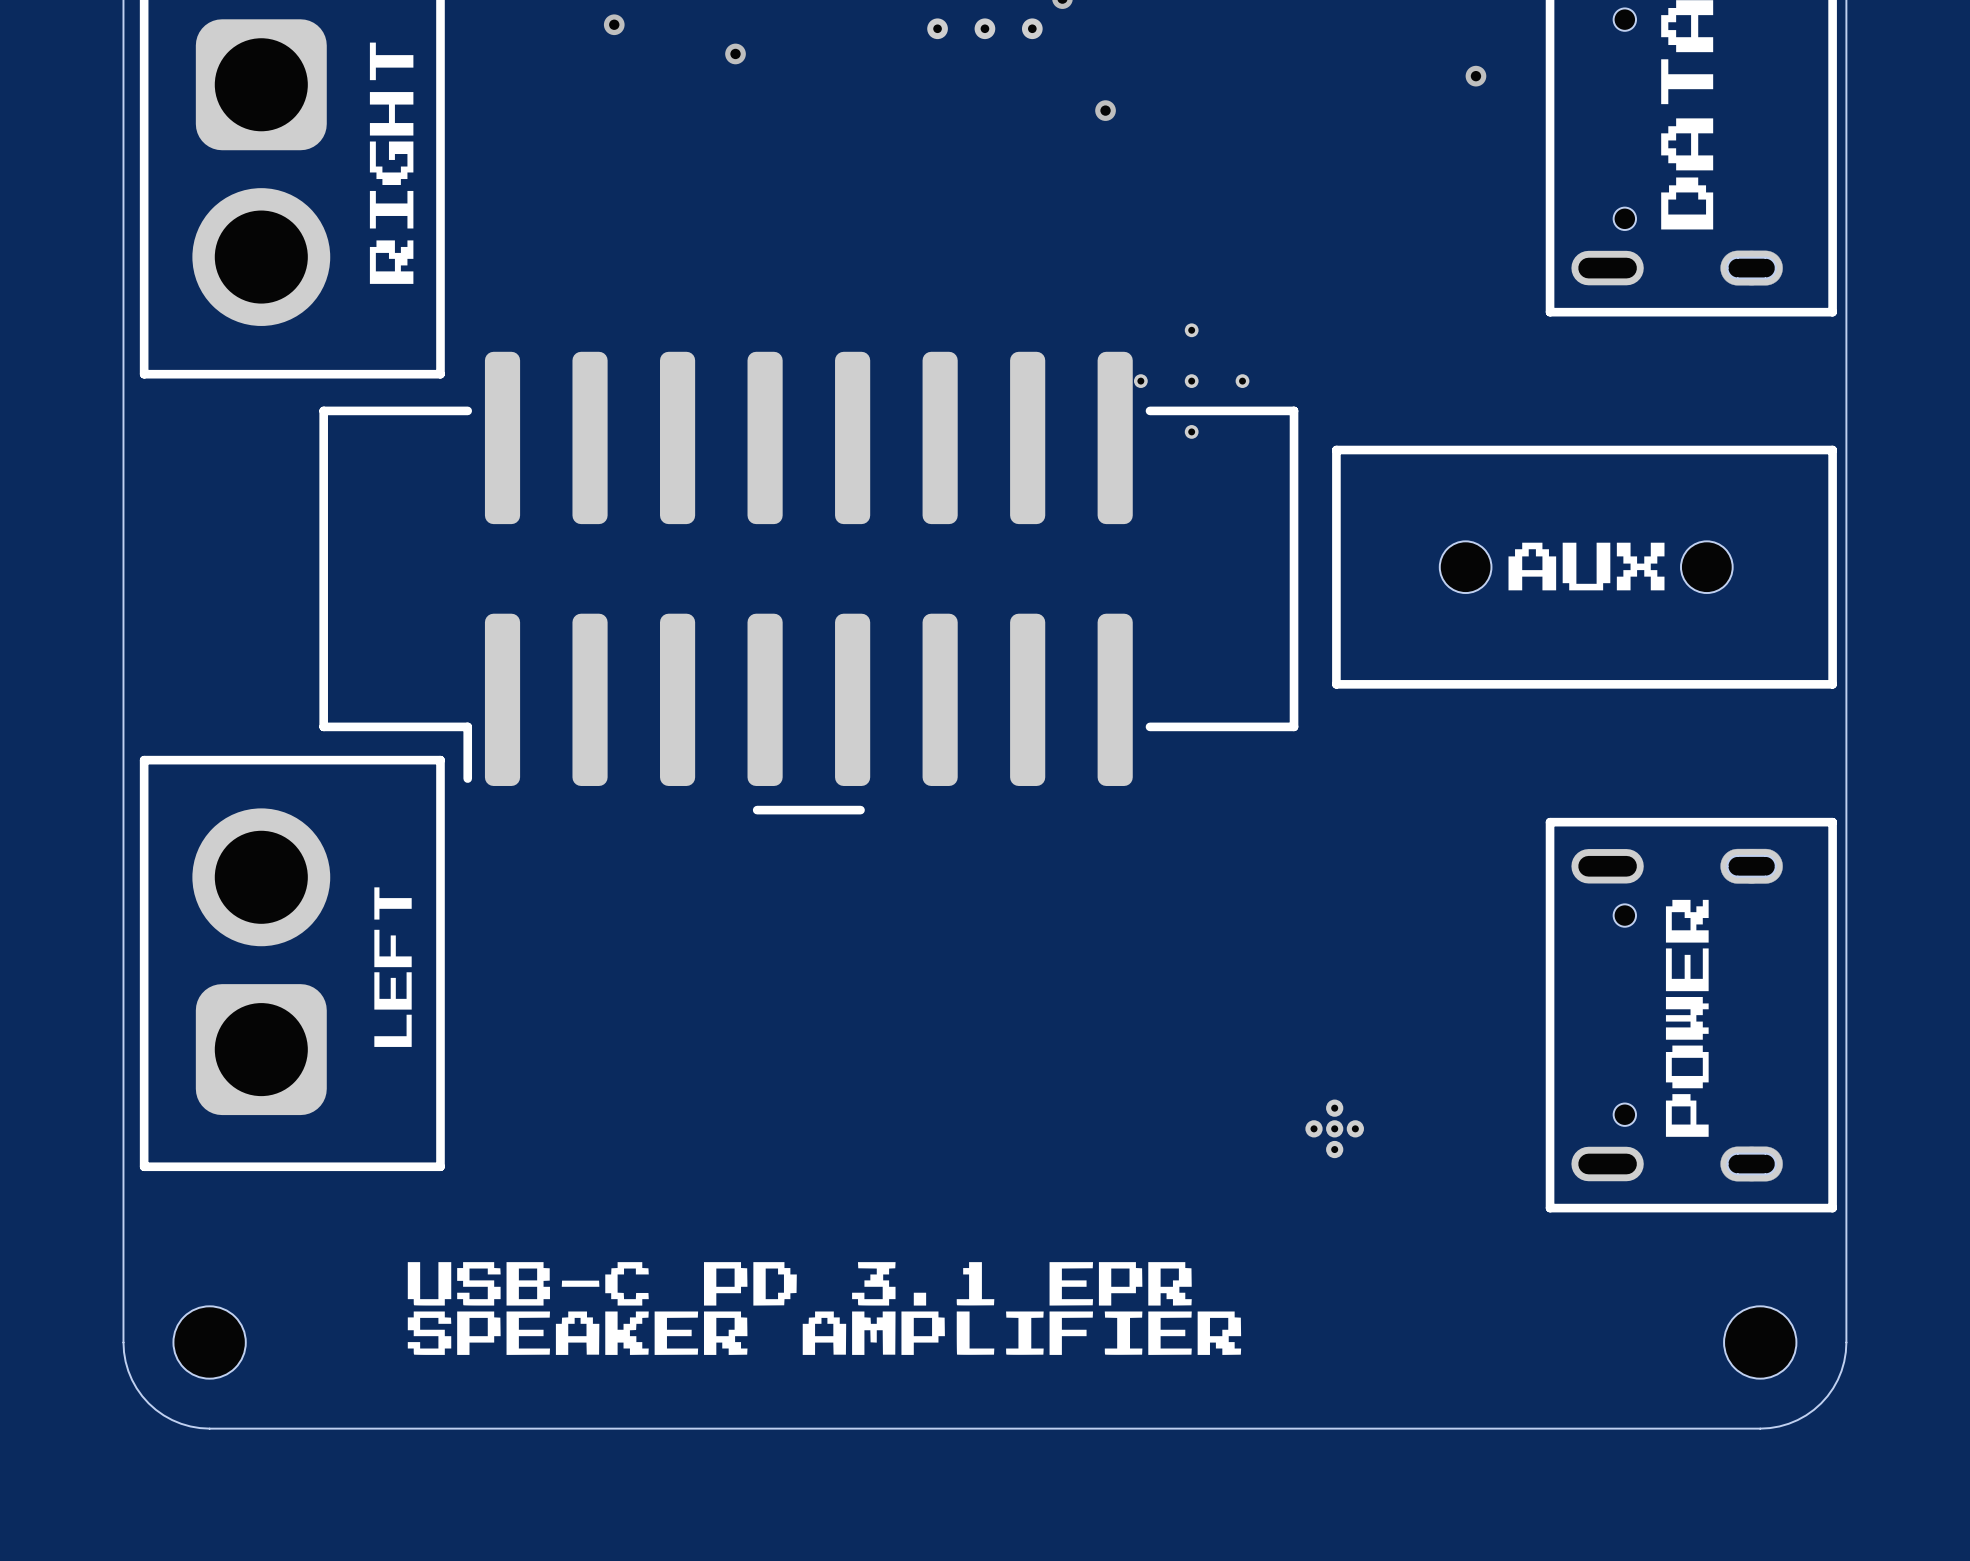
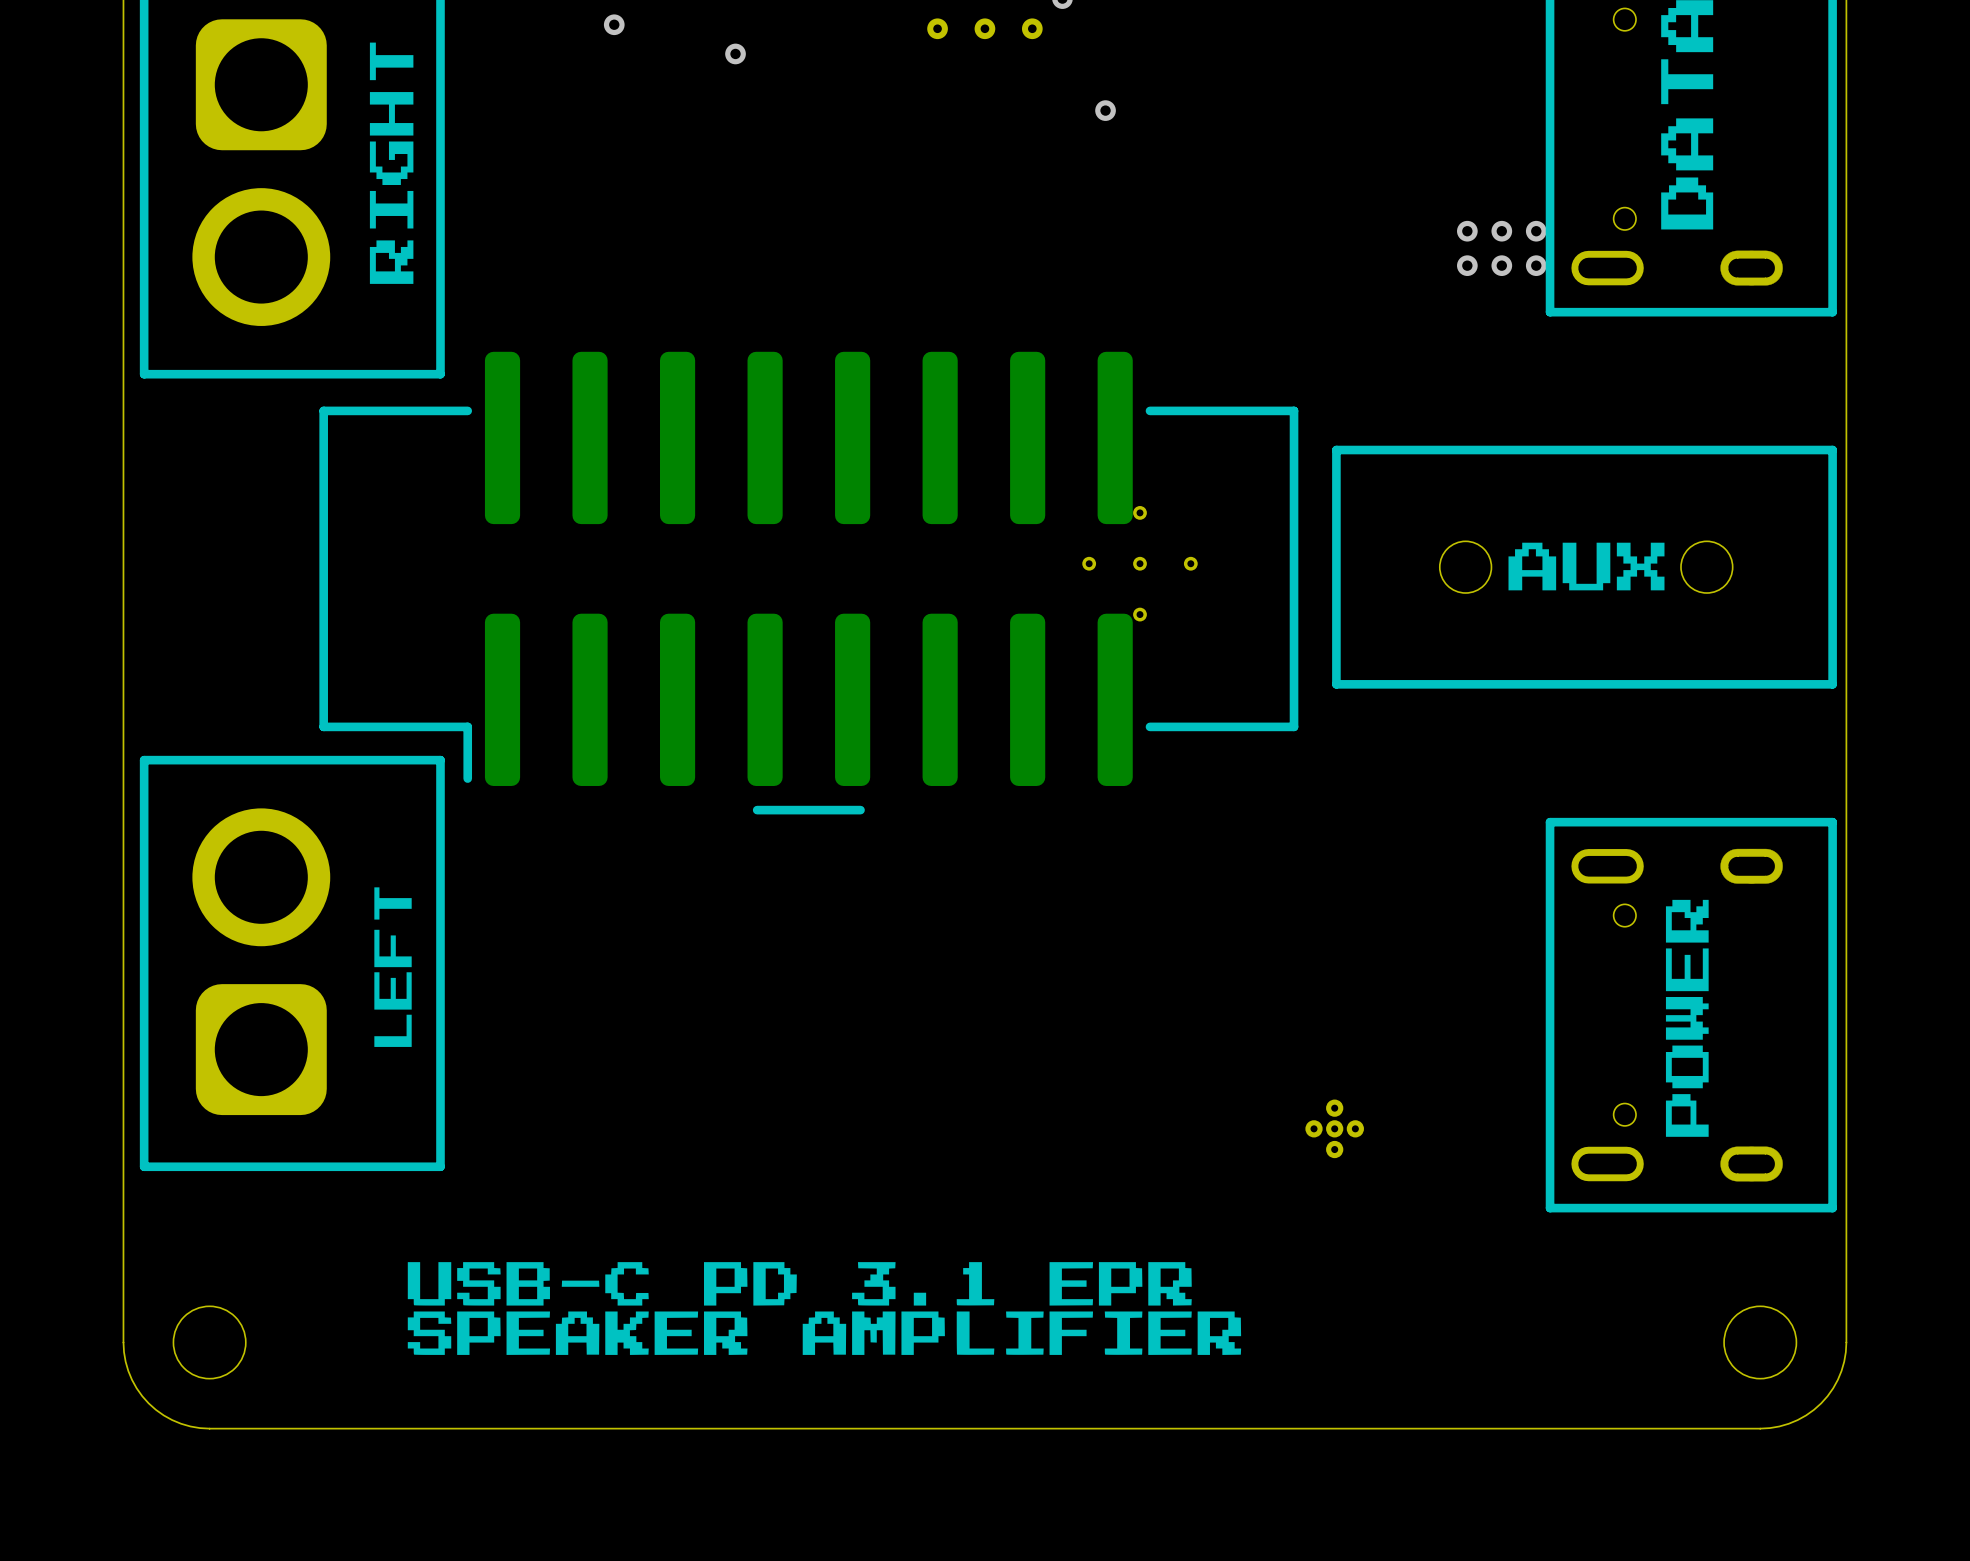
via: (1475, 76) -> none
via: none -> (1467, 231)
via: none -> (1501, 231)
via: none -> (1536, 231)
via: none -> (1467, 265)
via: none -> (1501, 265)
via: none -> (1536, 265)
part position: (1191, 381) -> (1139, 563)

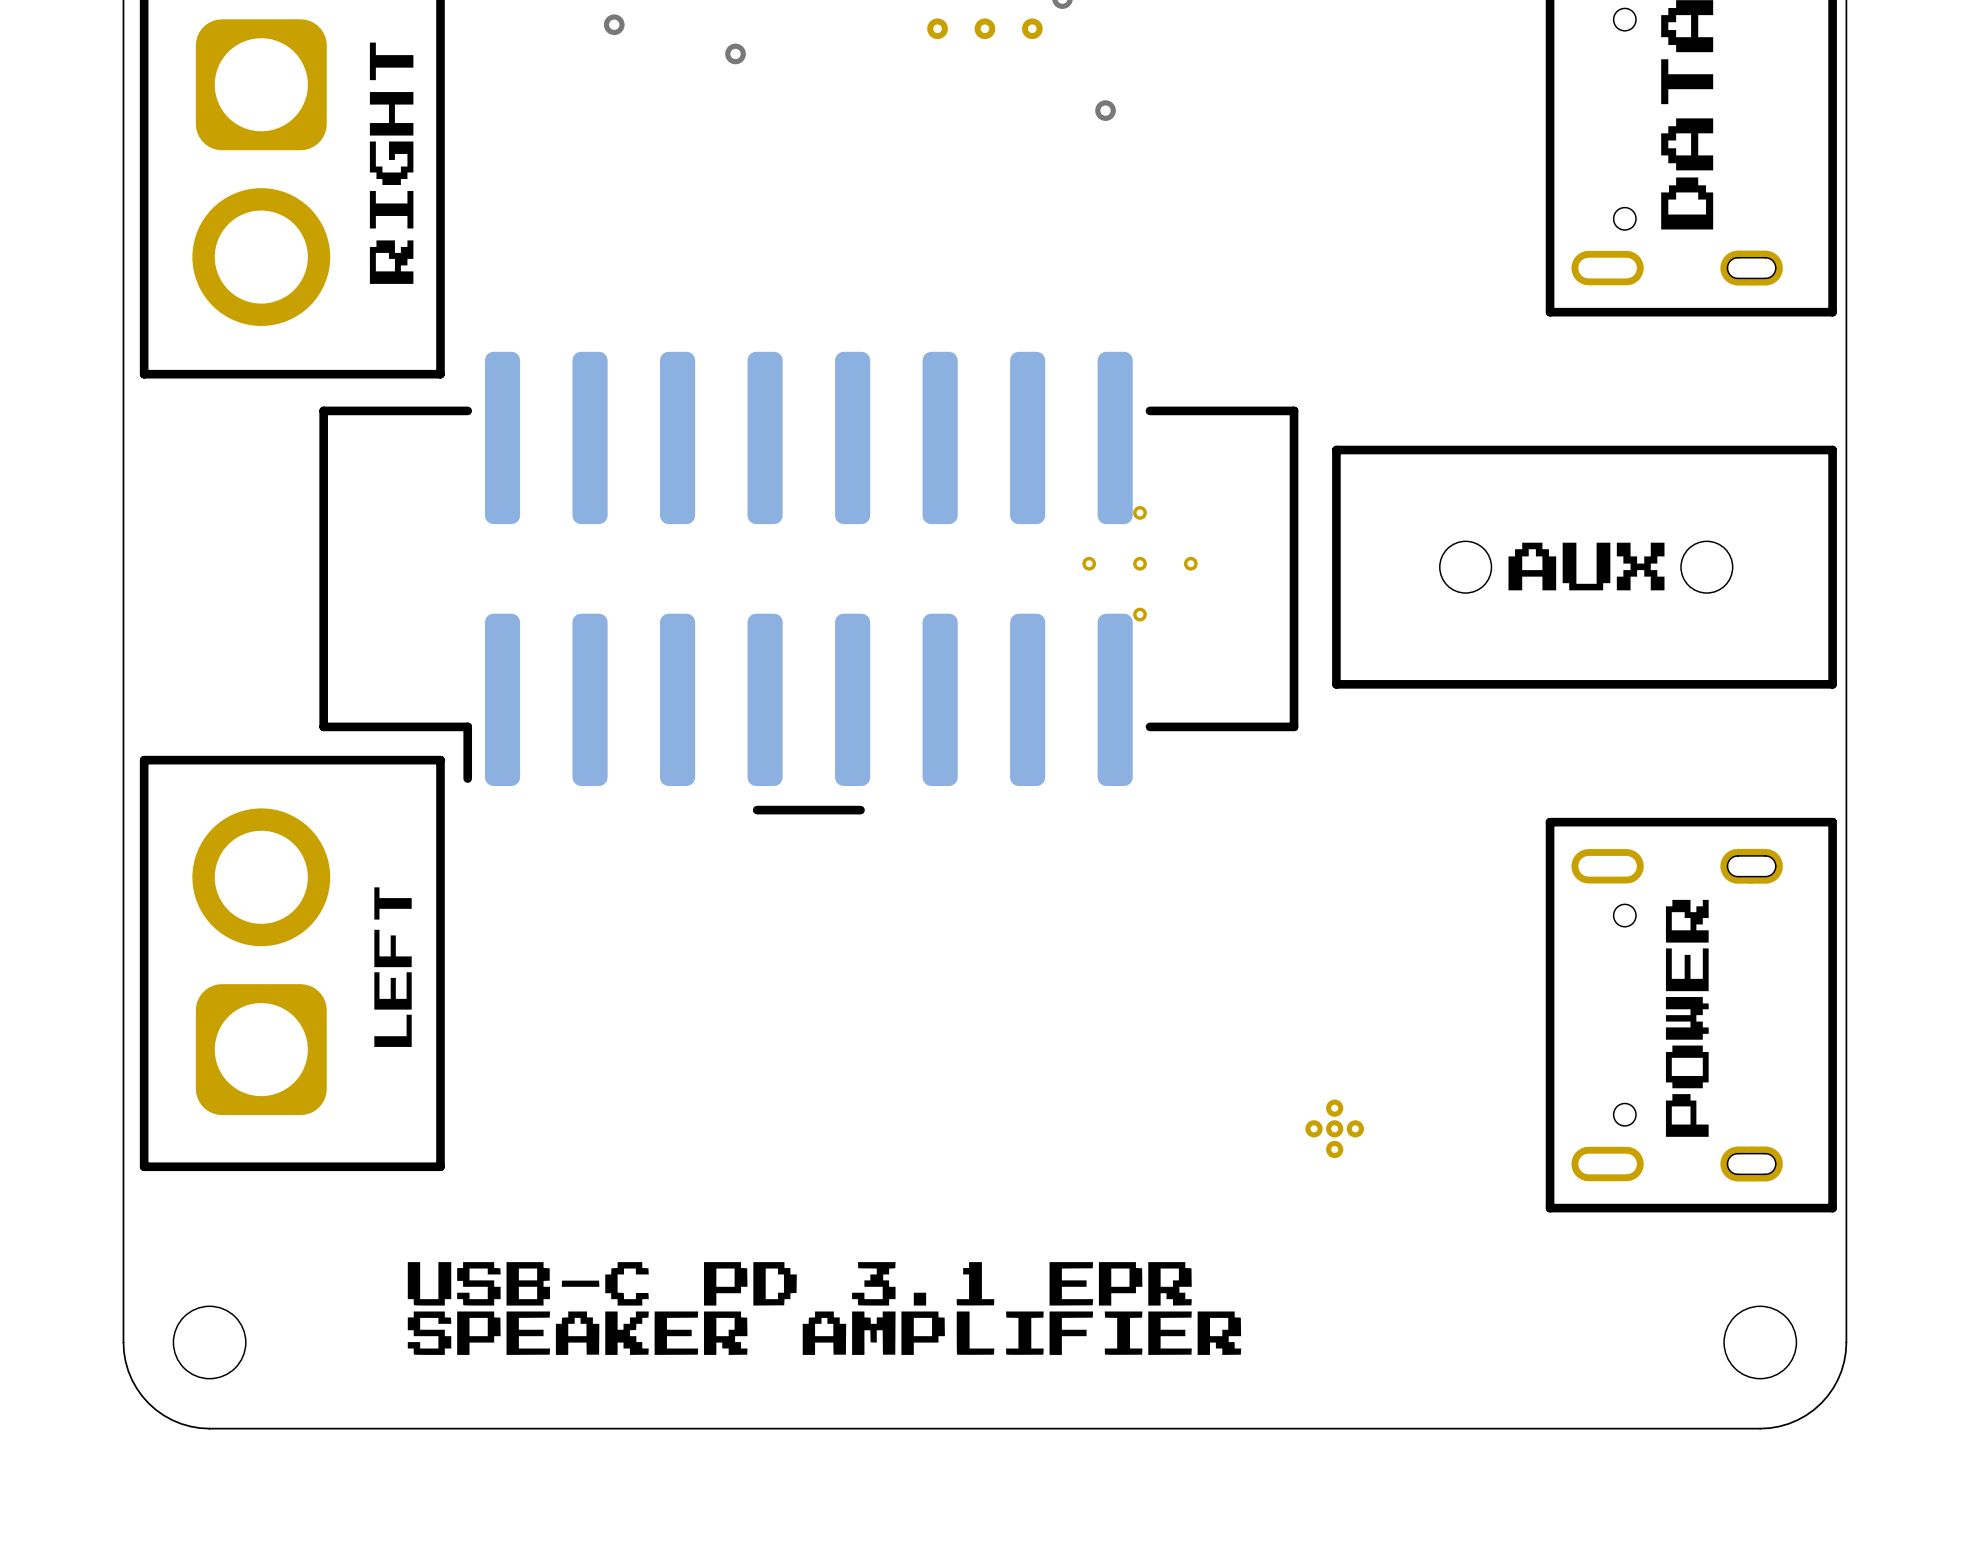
via: (1467, 231) -> none
via: (1501, 231) -> none
via: (1536, 231) -> none
via: (1467, 265) -> none
via: (1501, 265) -> none
via: (1536, 265) -> none

